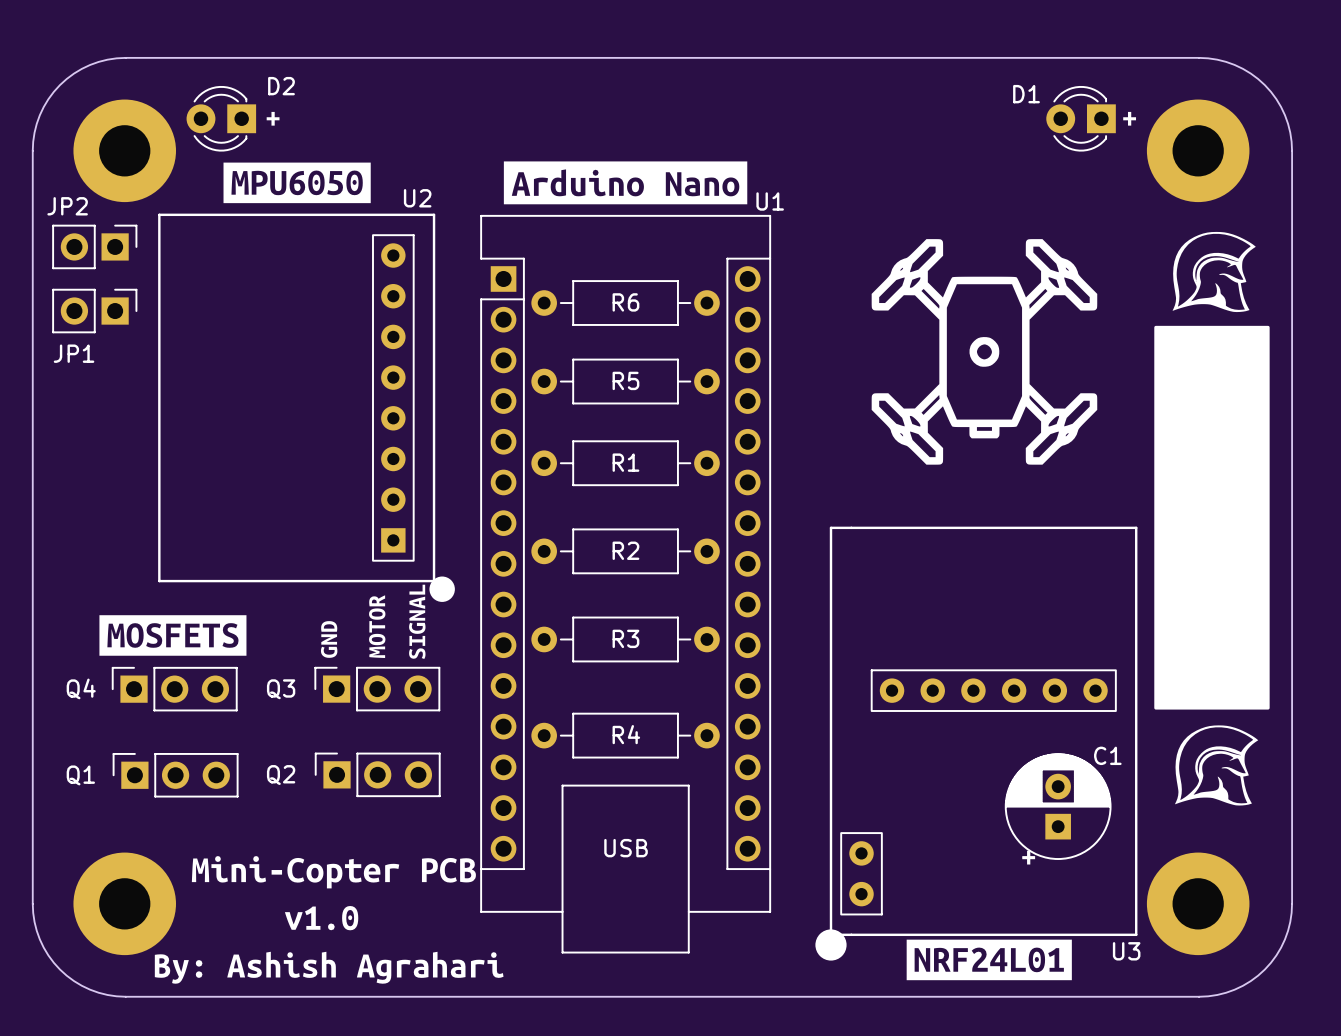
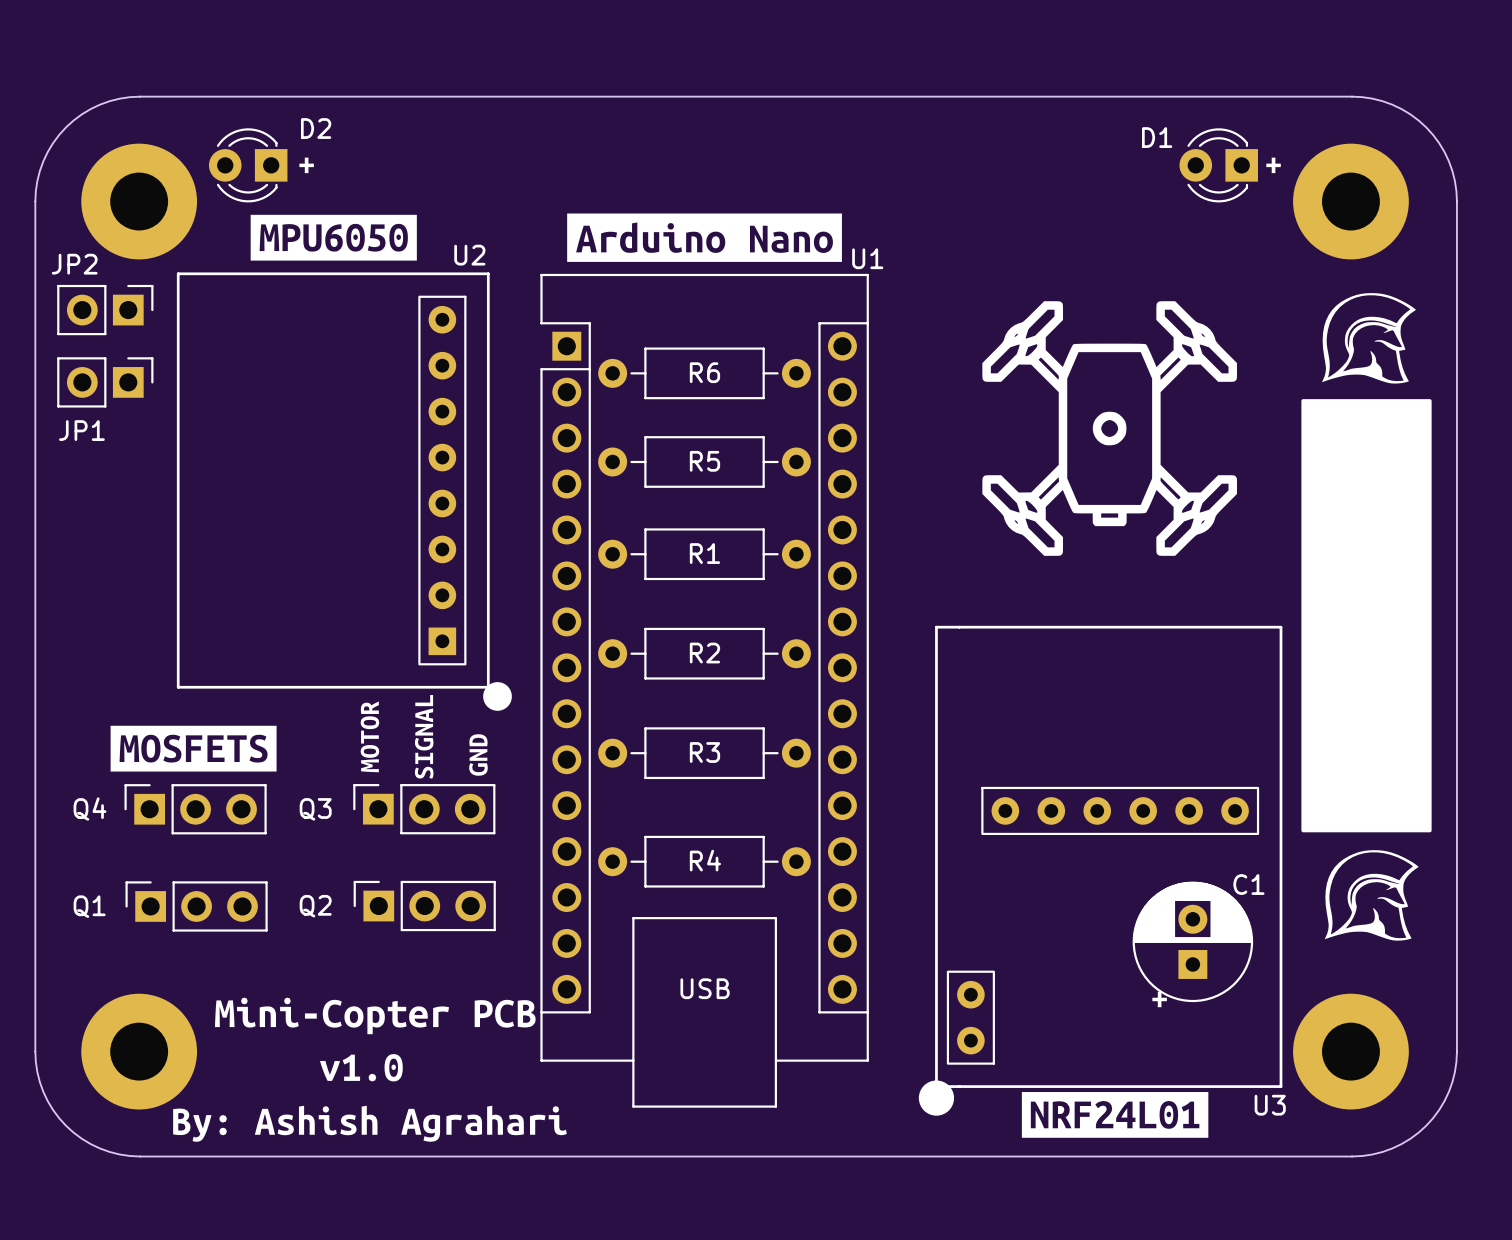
drawing position: (417, 621) -> (424, 736)
drawing position: (377, 626) -> (369, 736)
drawing position: (329, 639) -> (478, 754)

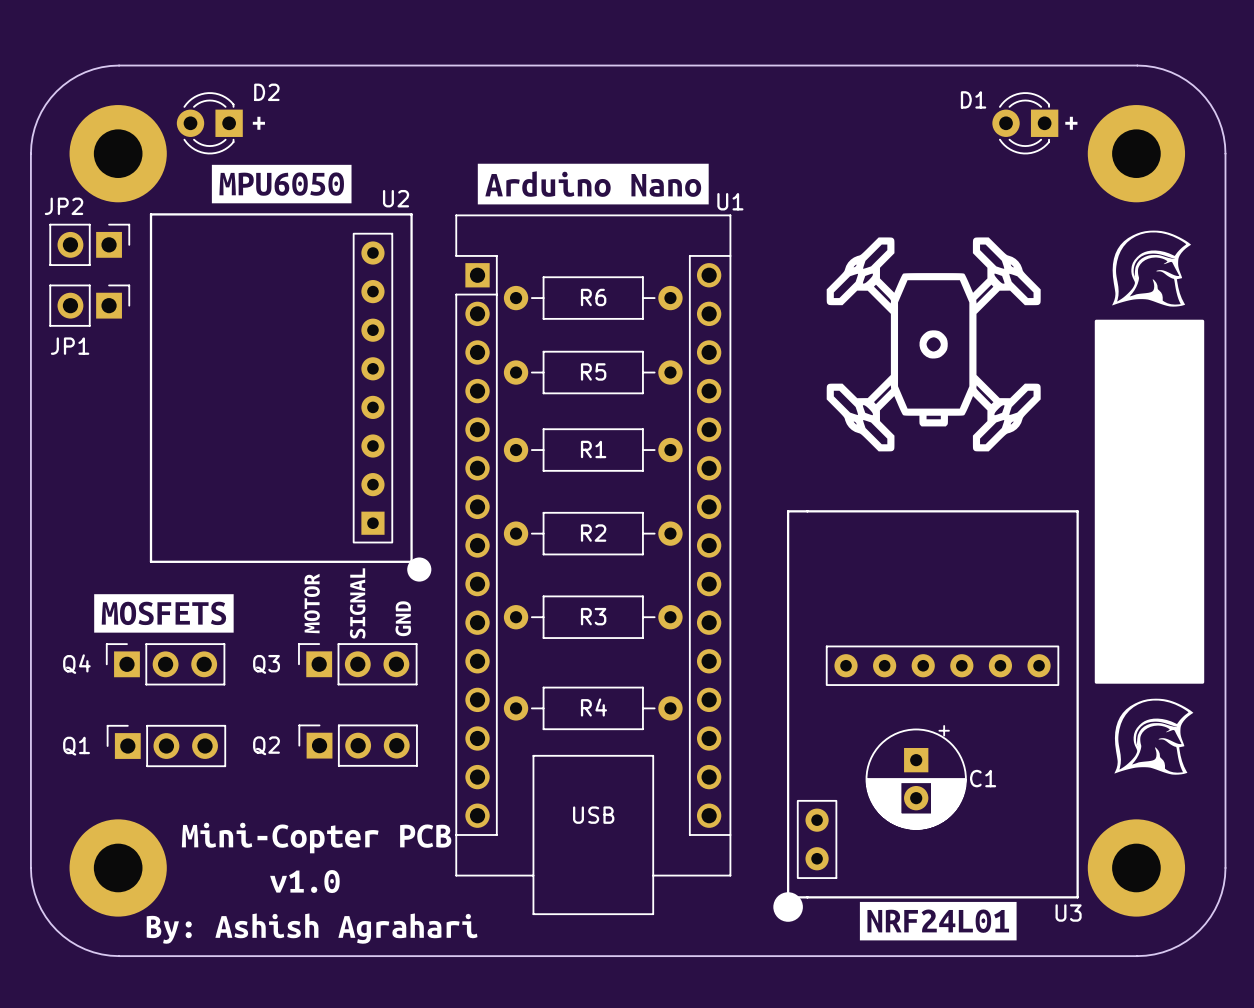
C1 name position: C1 (1248, 884) -> C1 (983, 778)
C1 rotation: 0° (1192, 943) -> 180° (916, 777)
C1 position: (1192, 943) -> (916, 777)
drawing: [1152, 991, 1167, 1008] -> none

